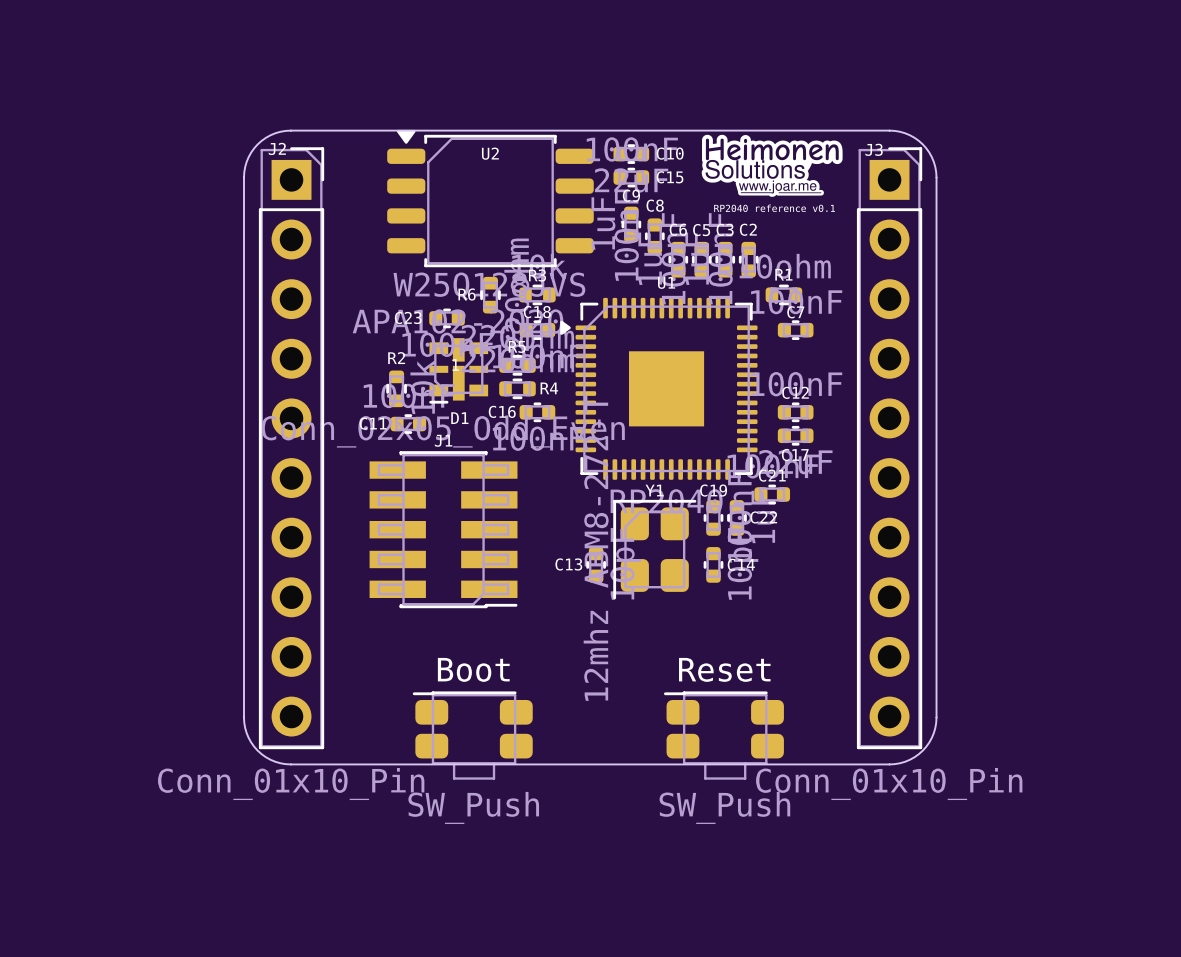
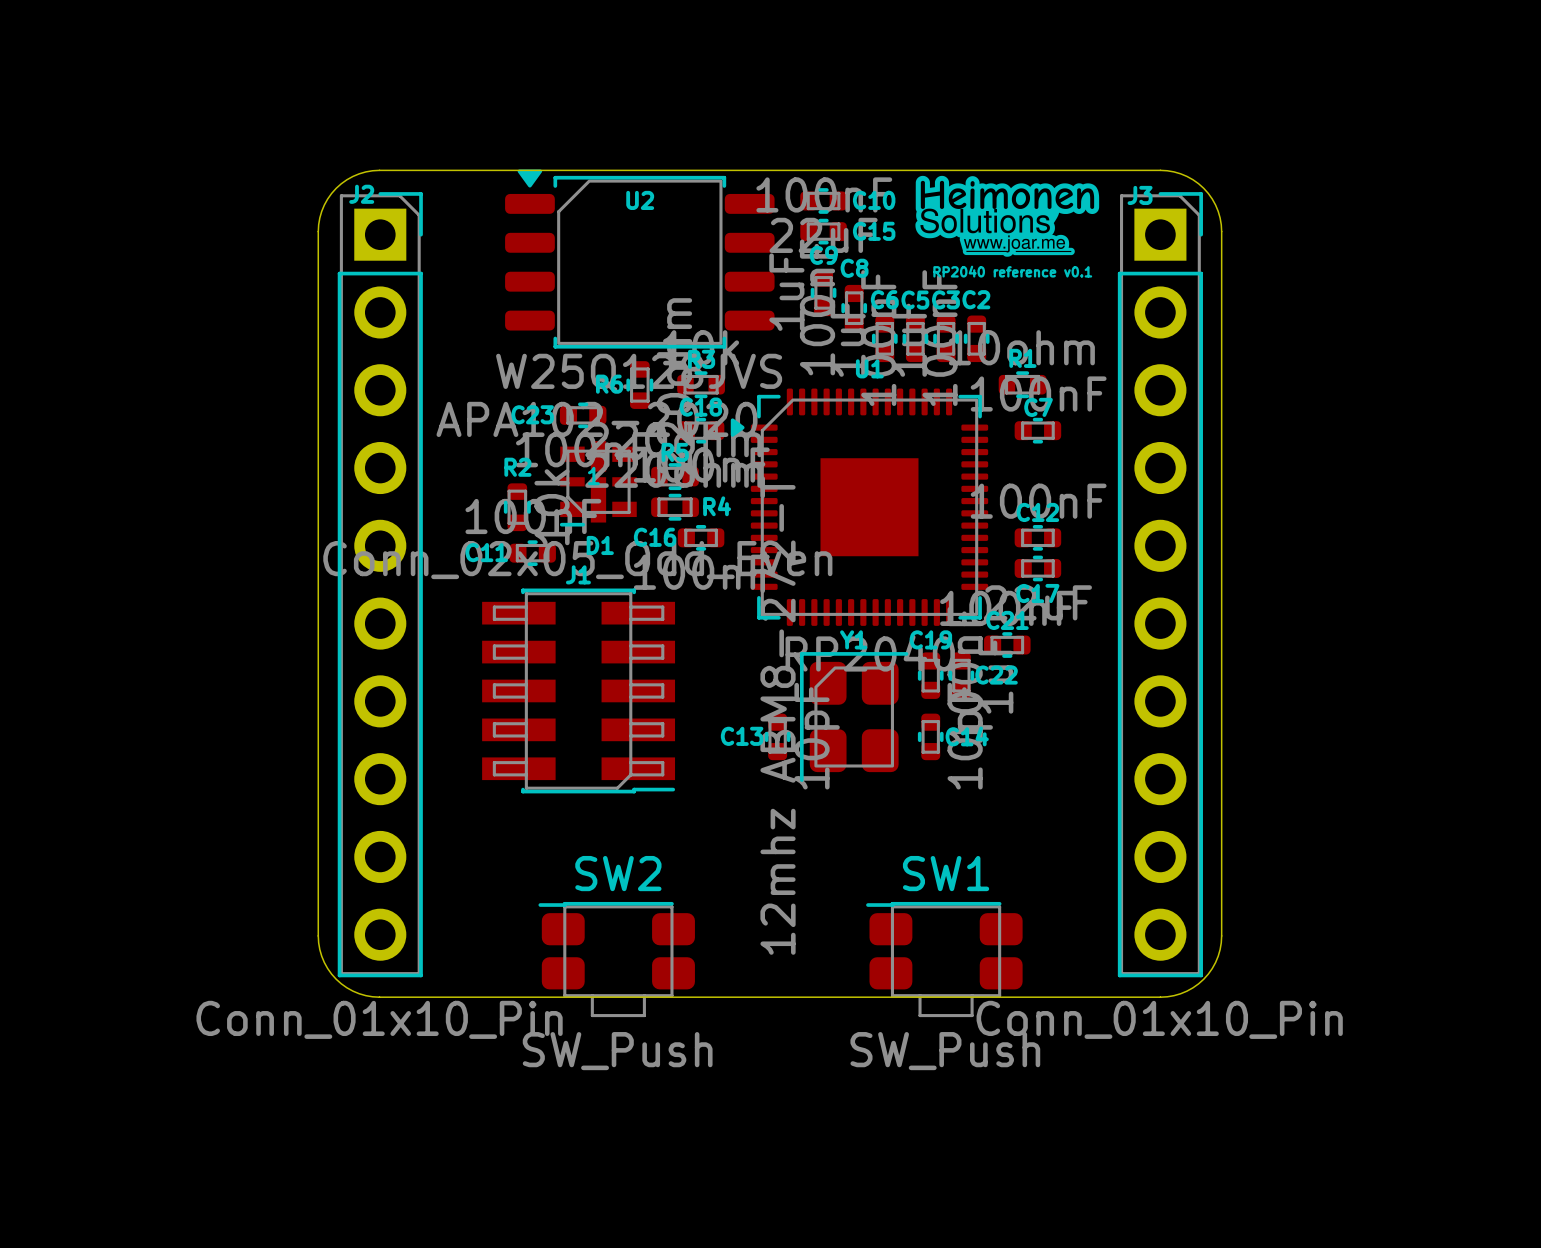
Boot name: Boot (473, 669) -> SW2 (618, 873)
Reset name: Reset (724, 669) -> SW1 (946, 873)

